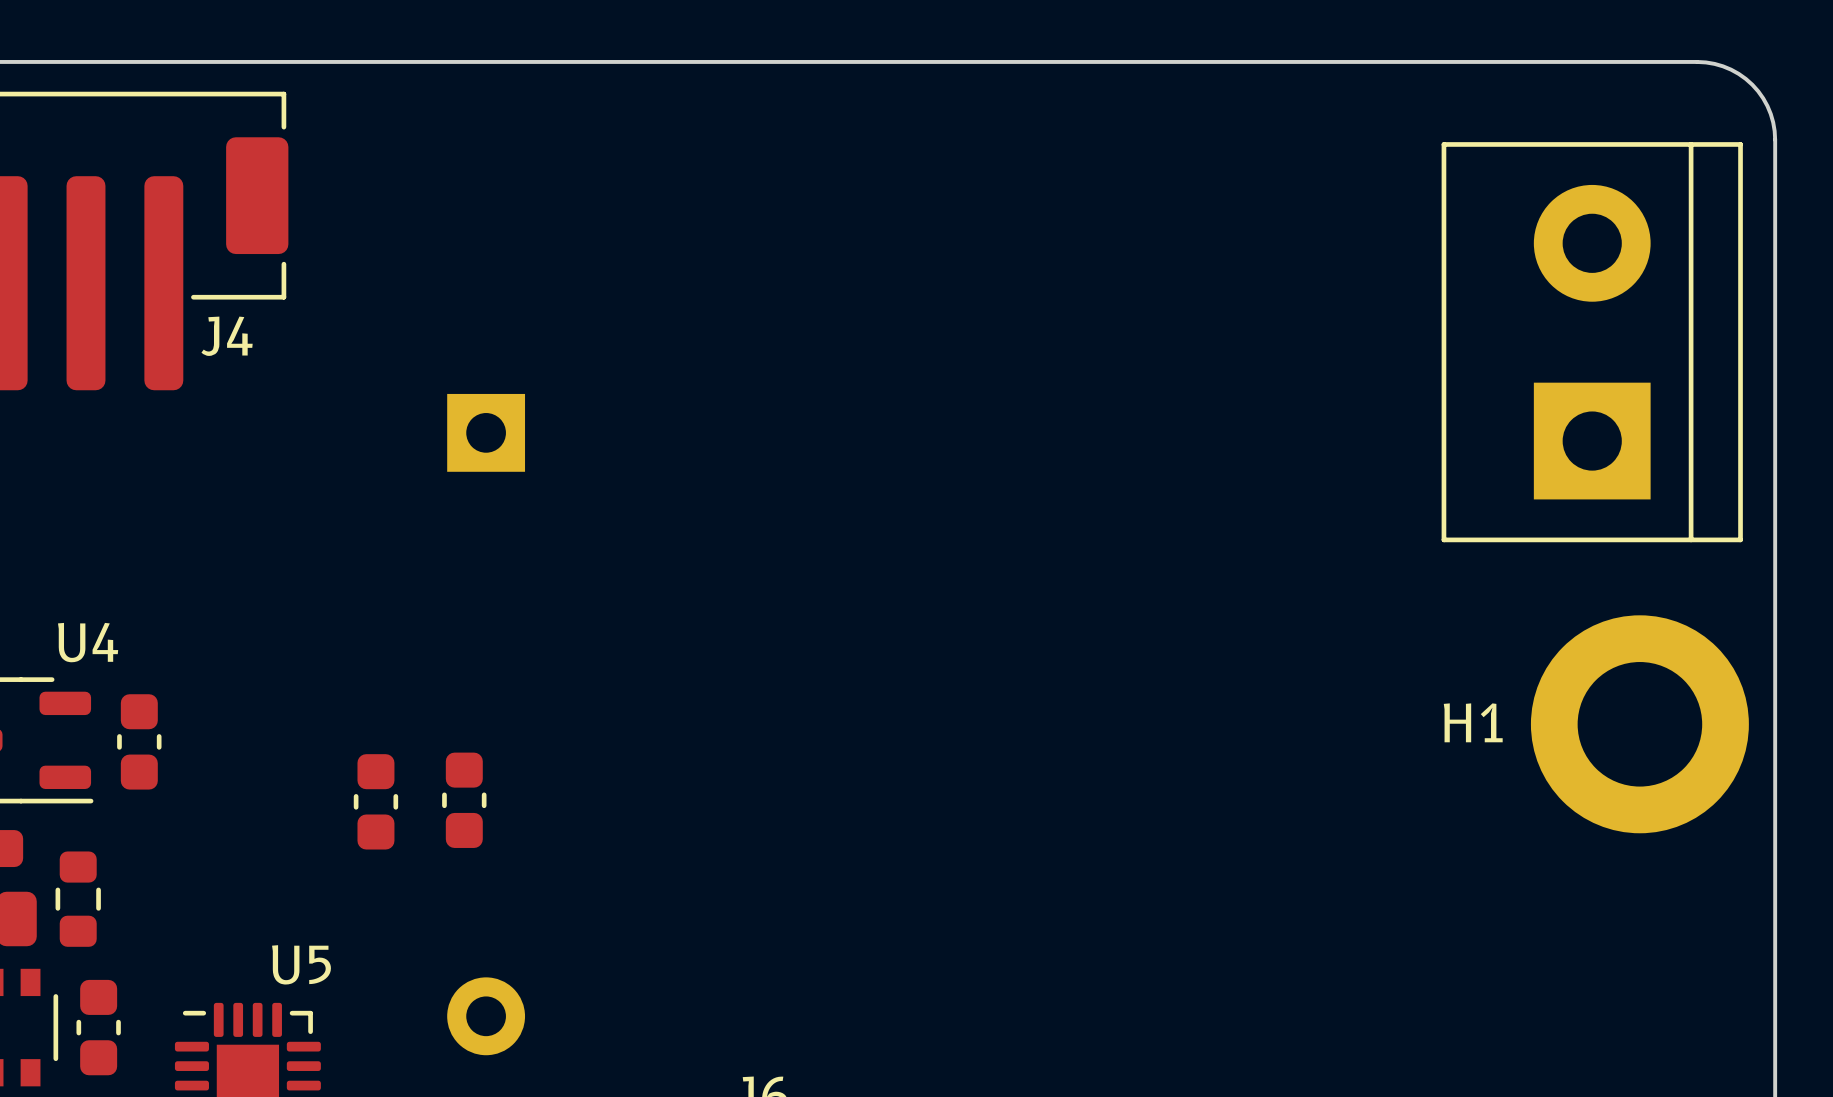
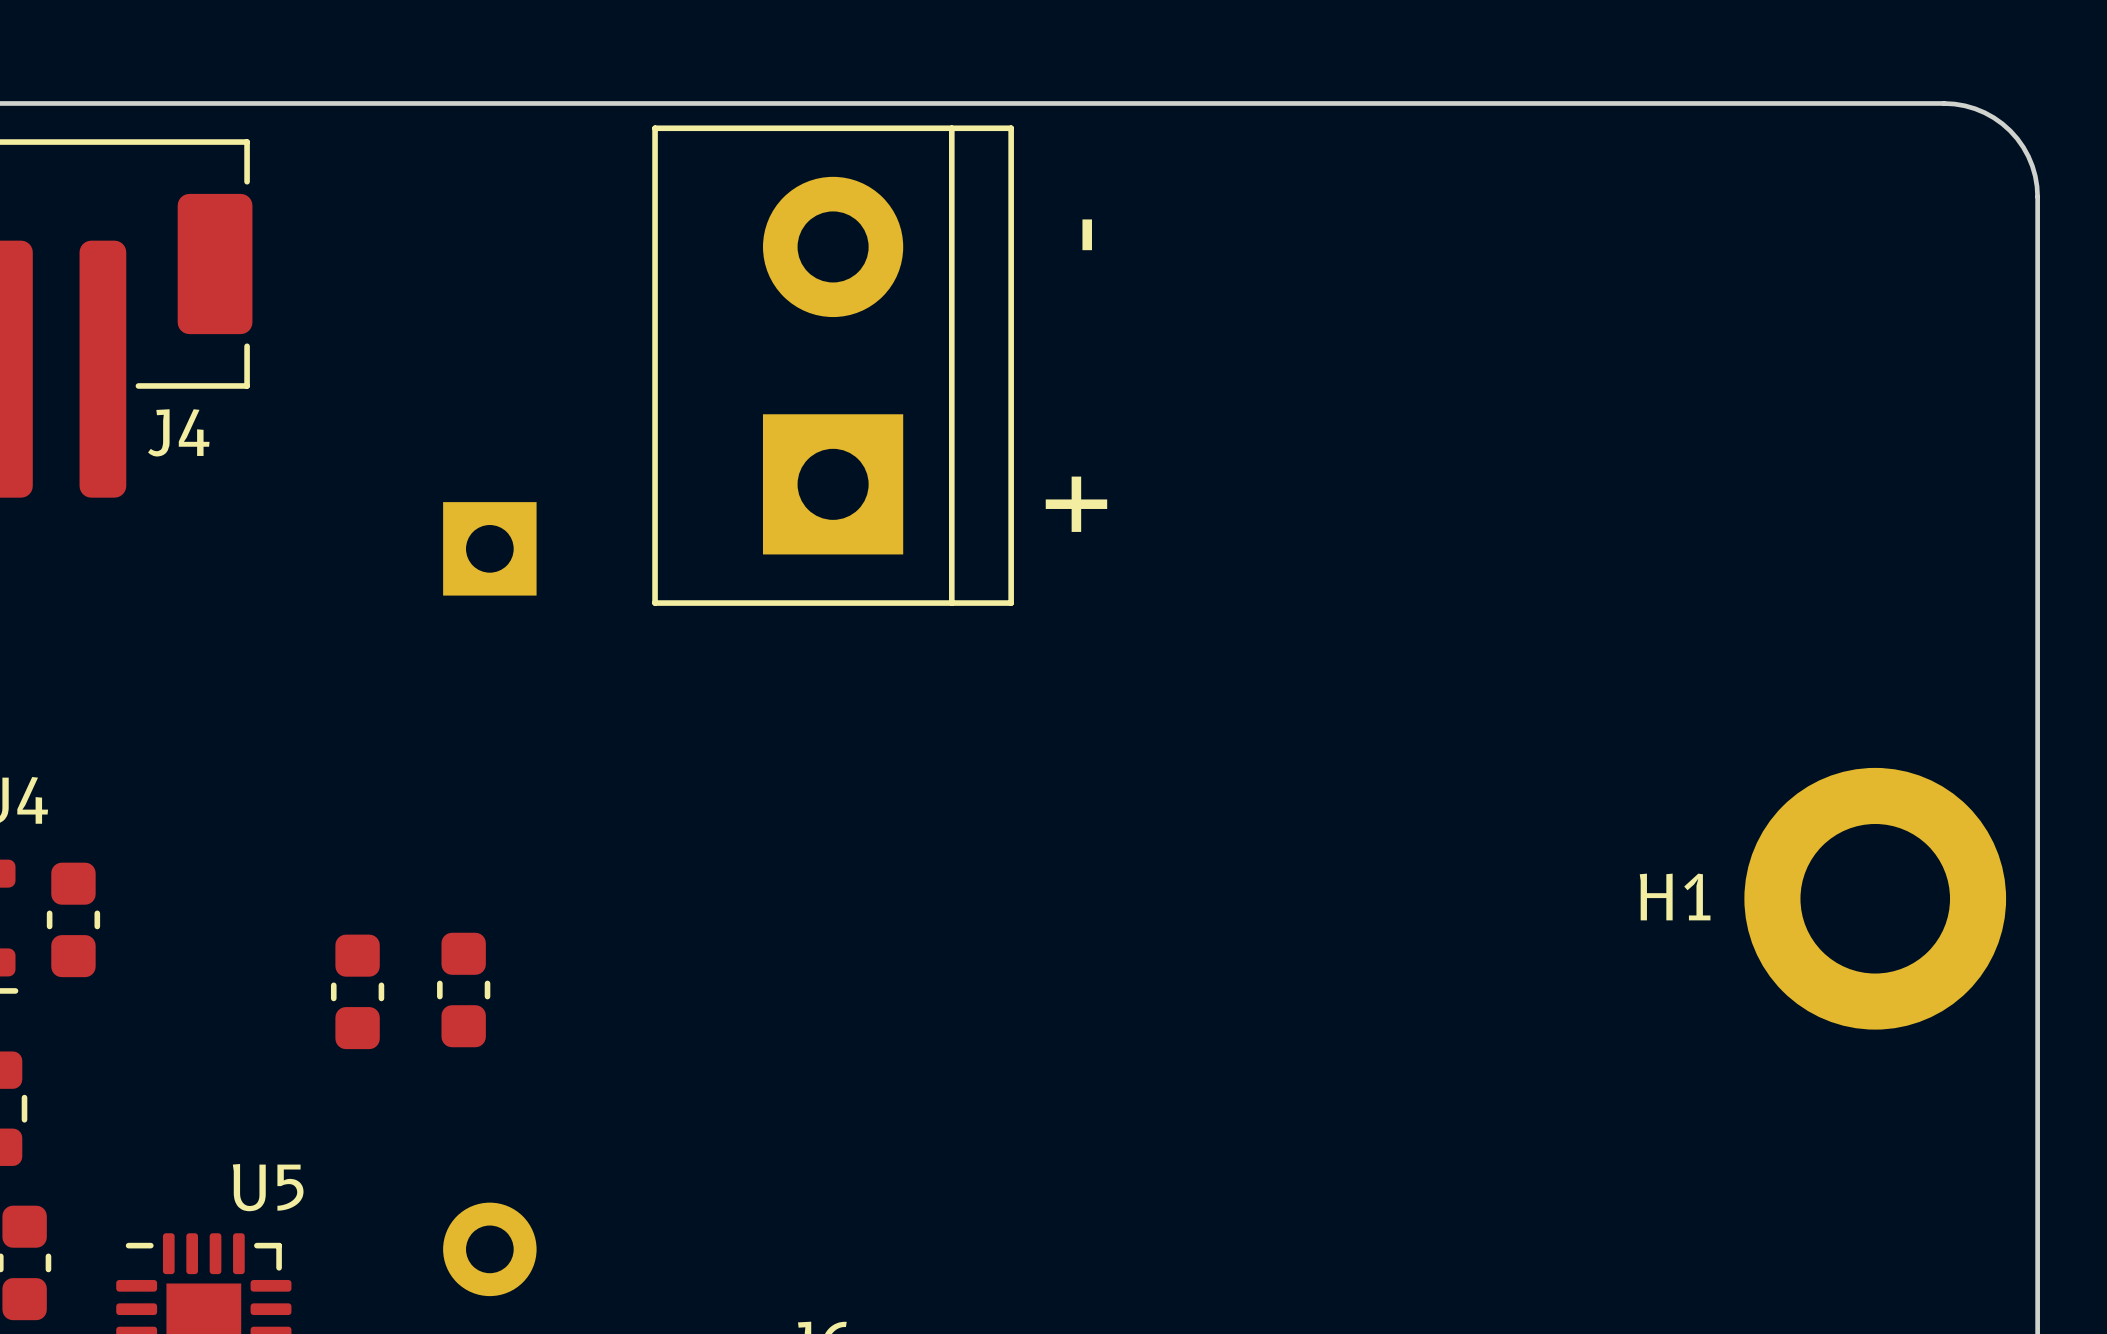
text: none -> - (1087, 234)
part position: (1592, 342) -> (833, 365)
text: none -> + (1076, 504)

